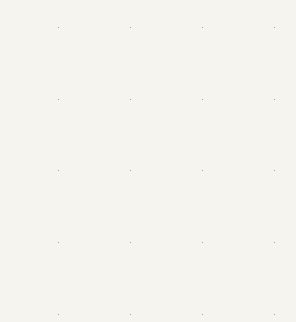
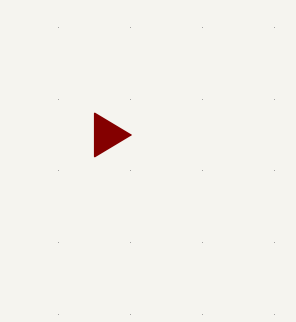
part: none -> (112, 134)

